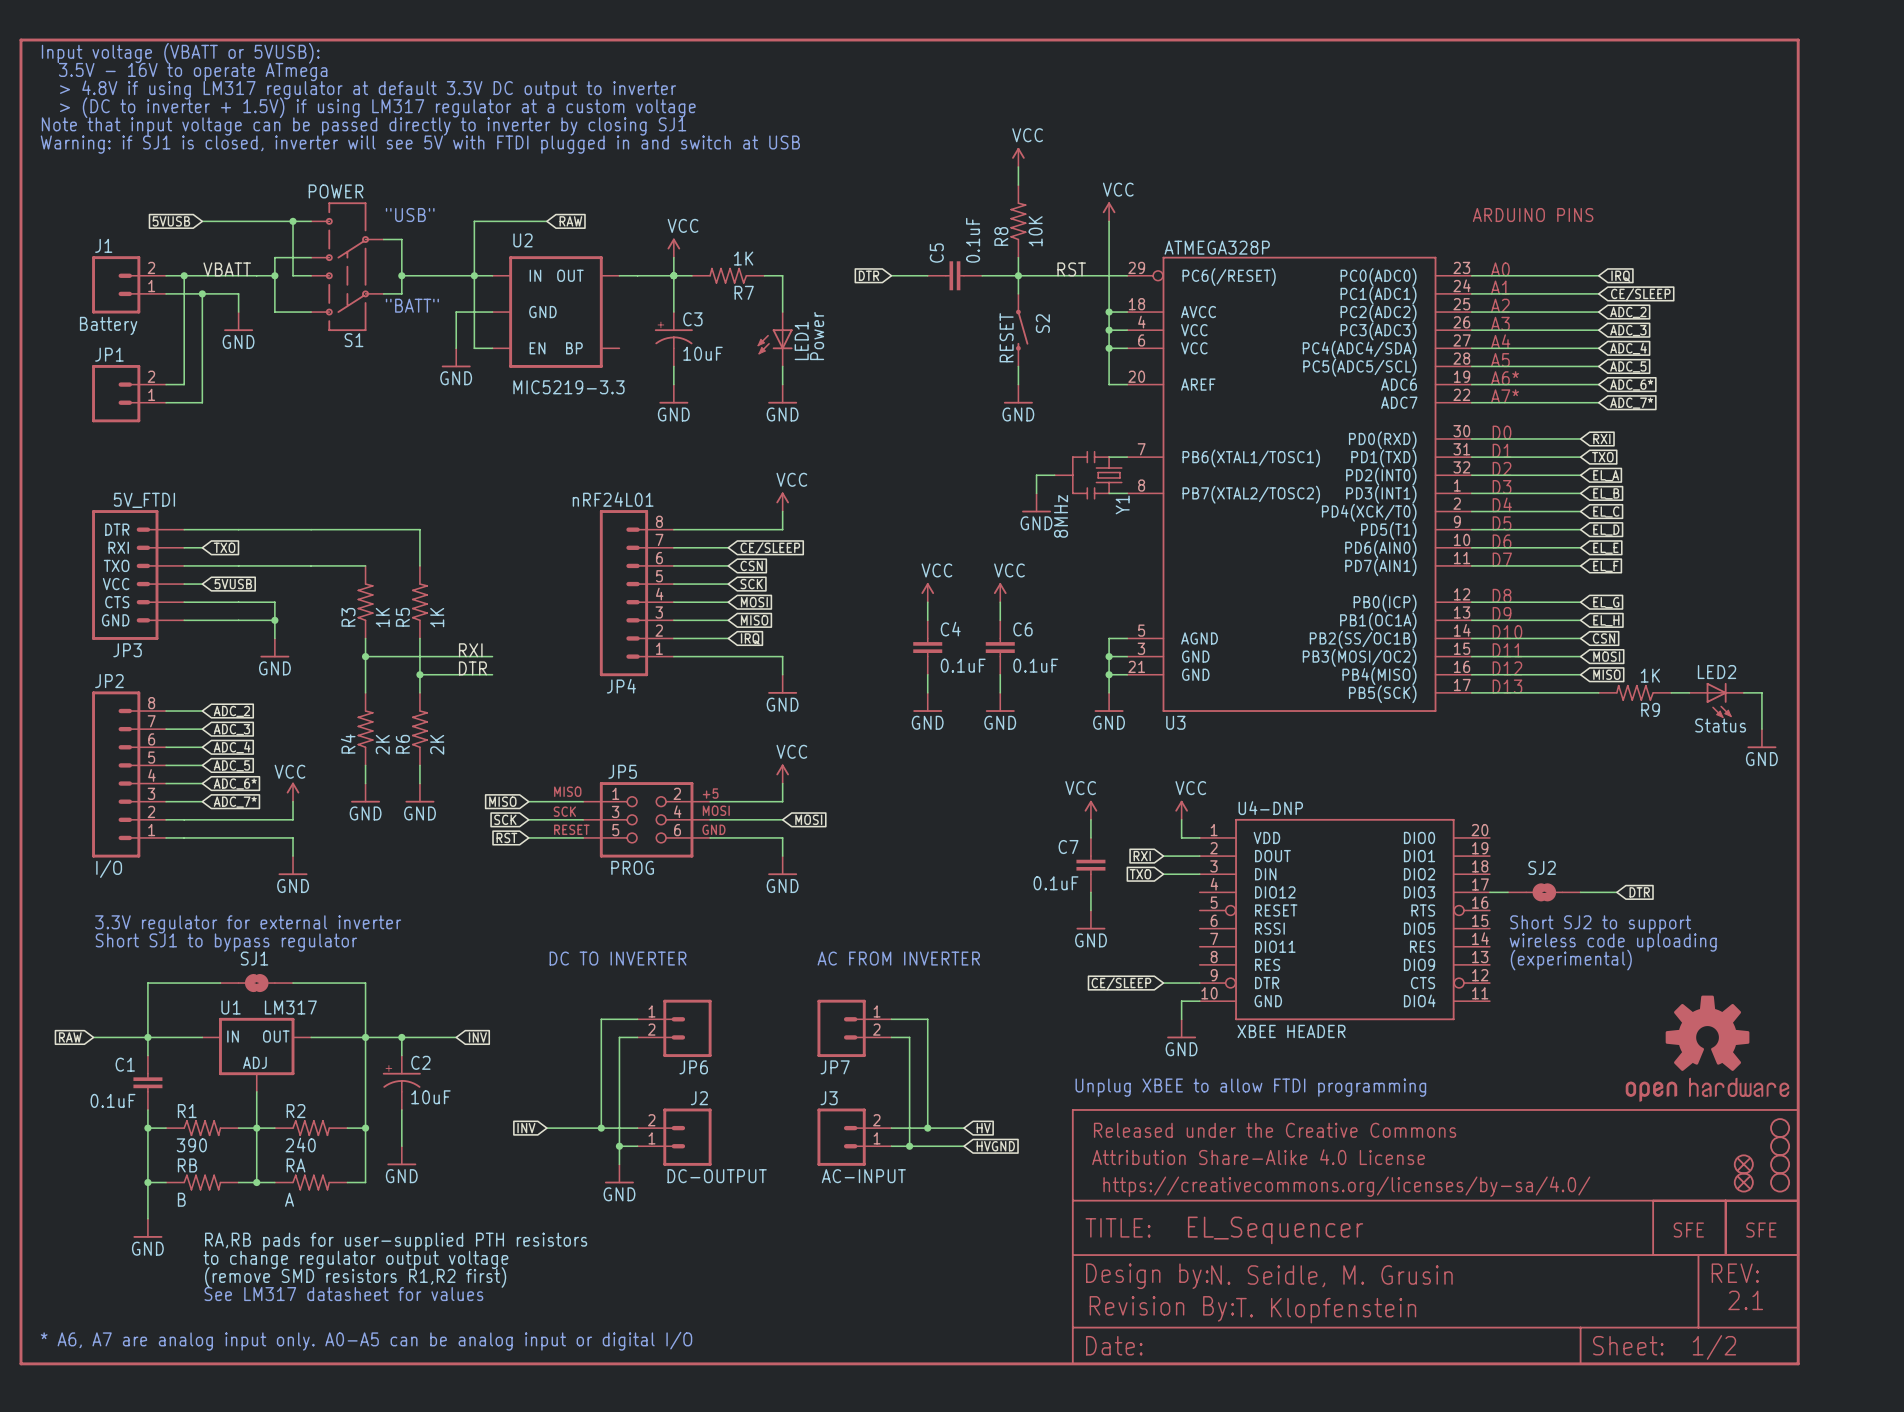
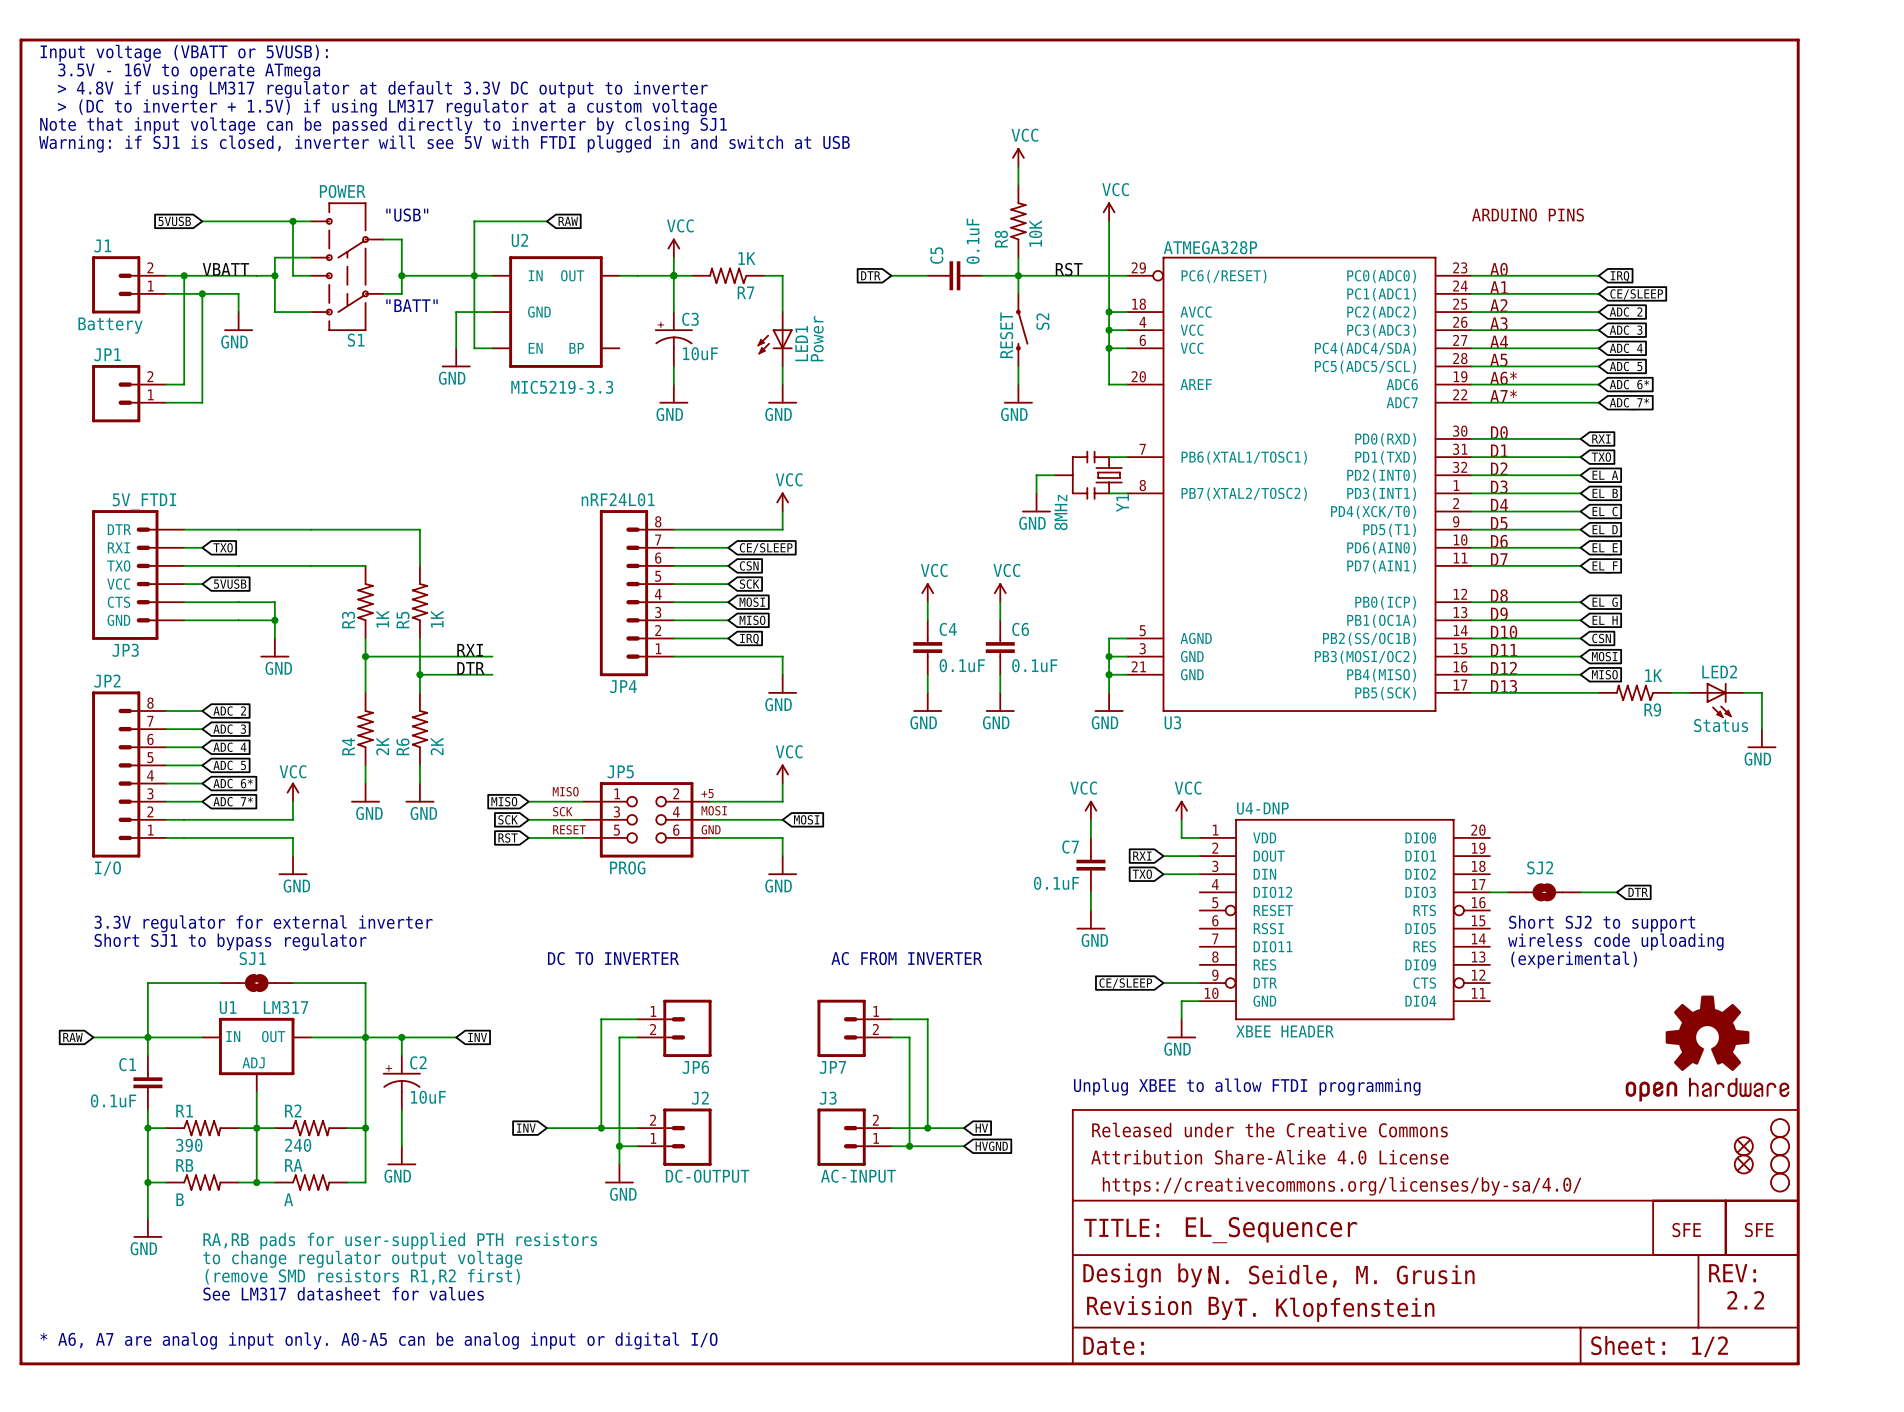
part position: (1743, 1182) -> (1743, 1146)
text: 2.1 (1745, 1300) -> 2.2 (1745, 1300)

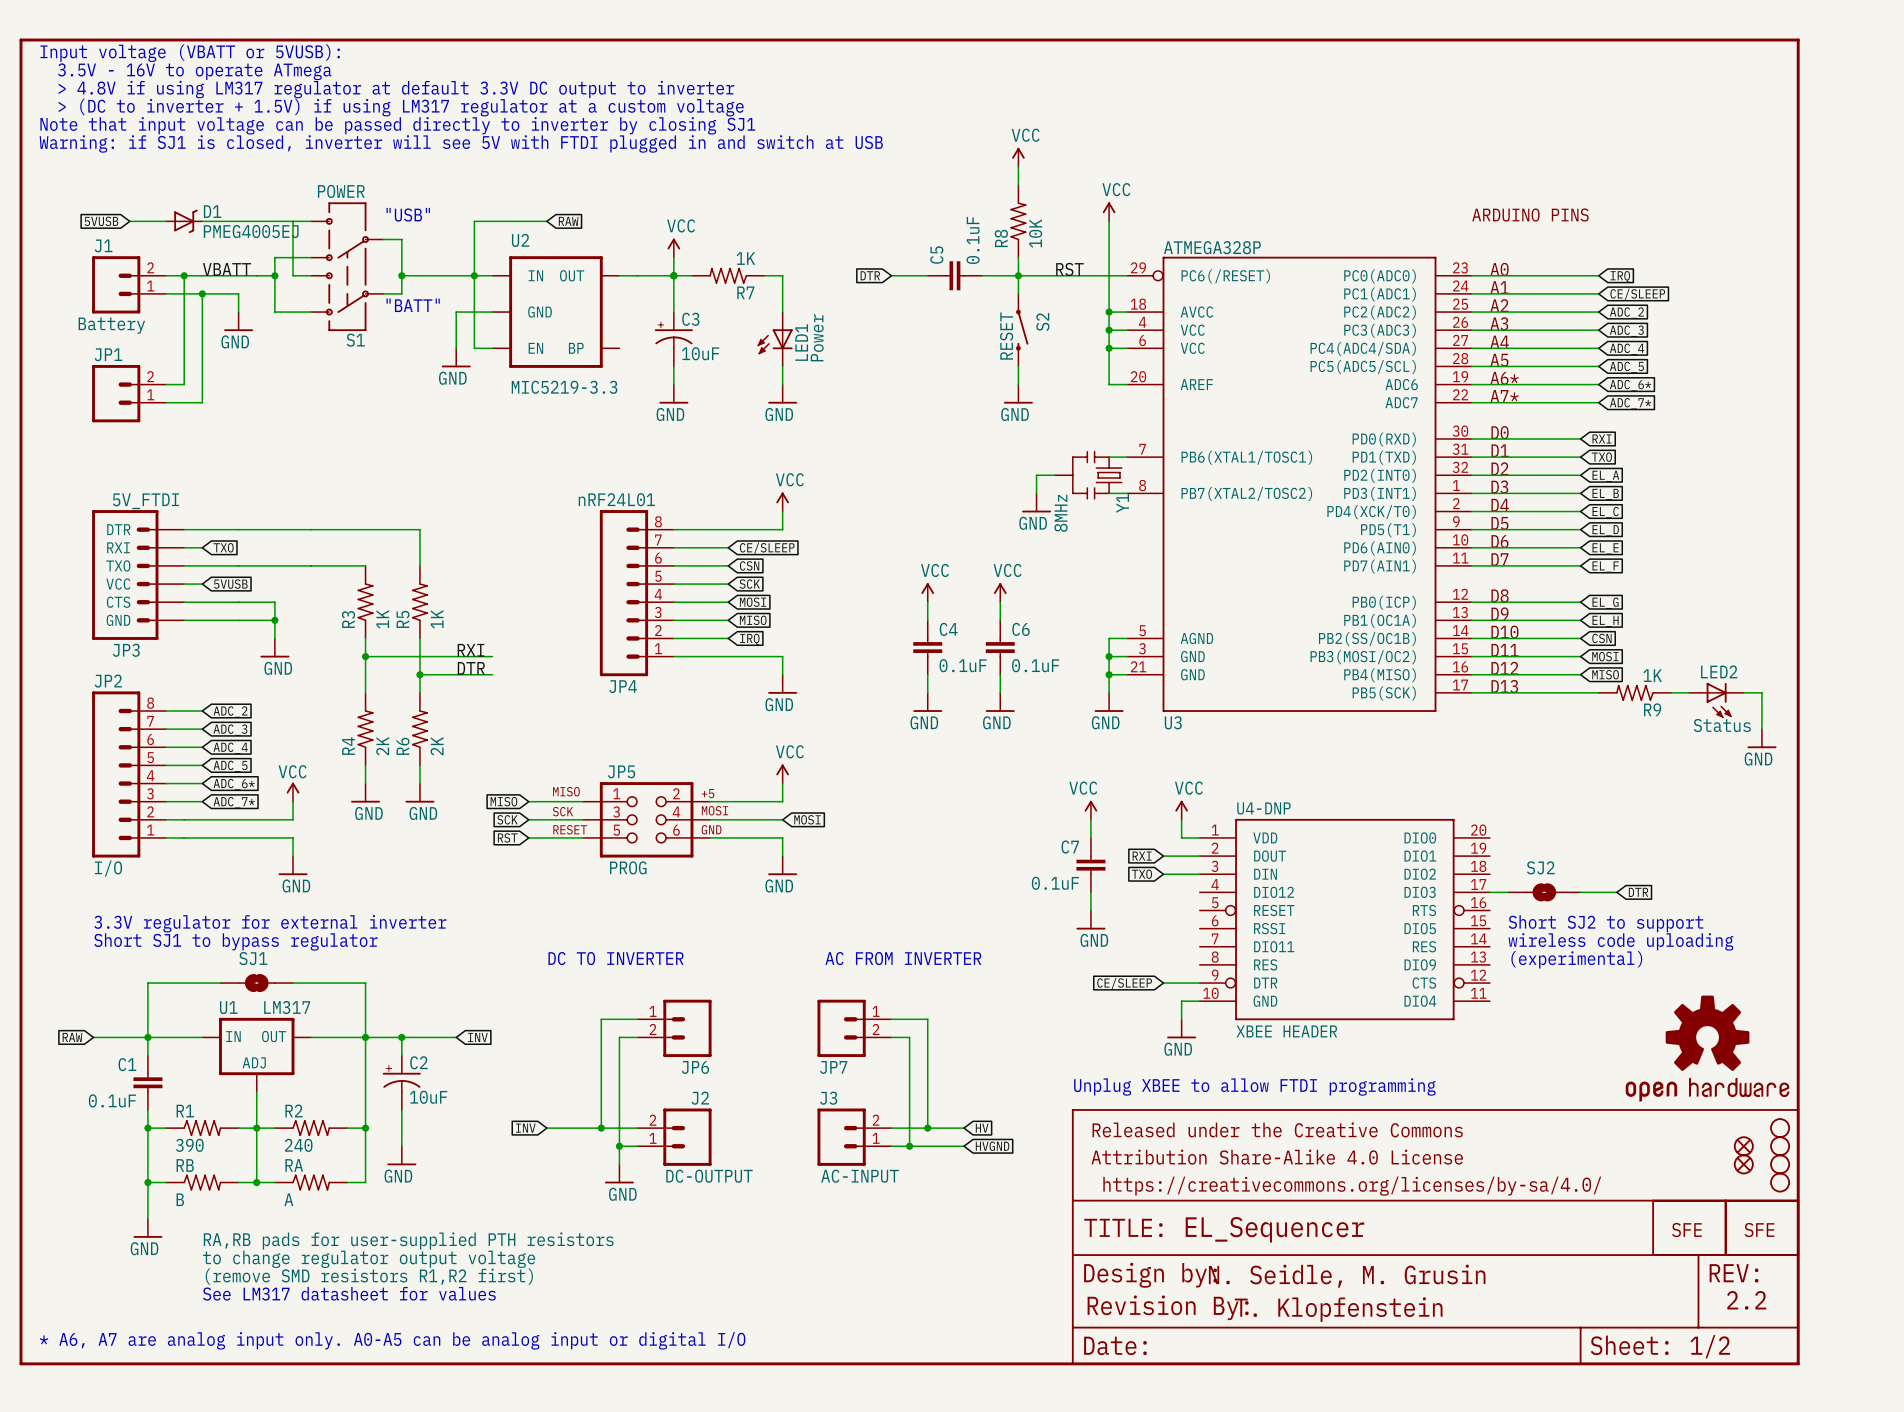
wire: none -> (129, 221) (166, 221)
global label position: 5VUSB (174, 221) -> 5VUSB (101, 221)
D1: none -> PMEG4005EJ (184, 221)
junction: (293, 221) -> none

